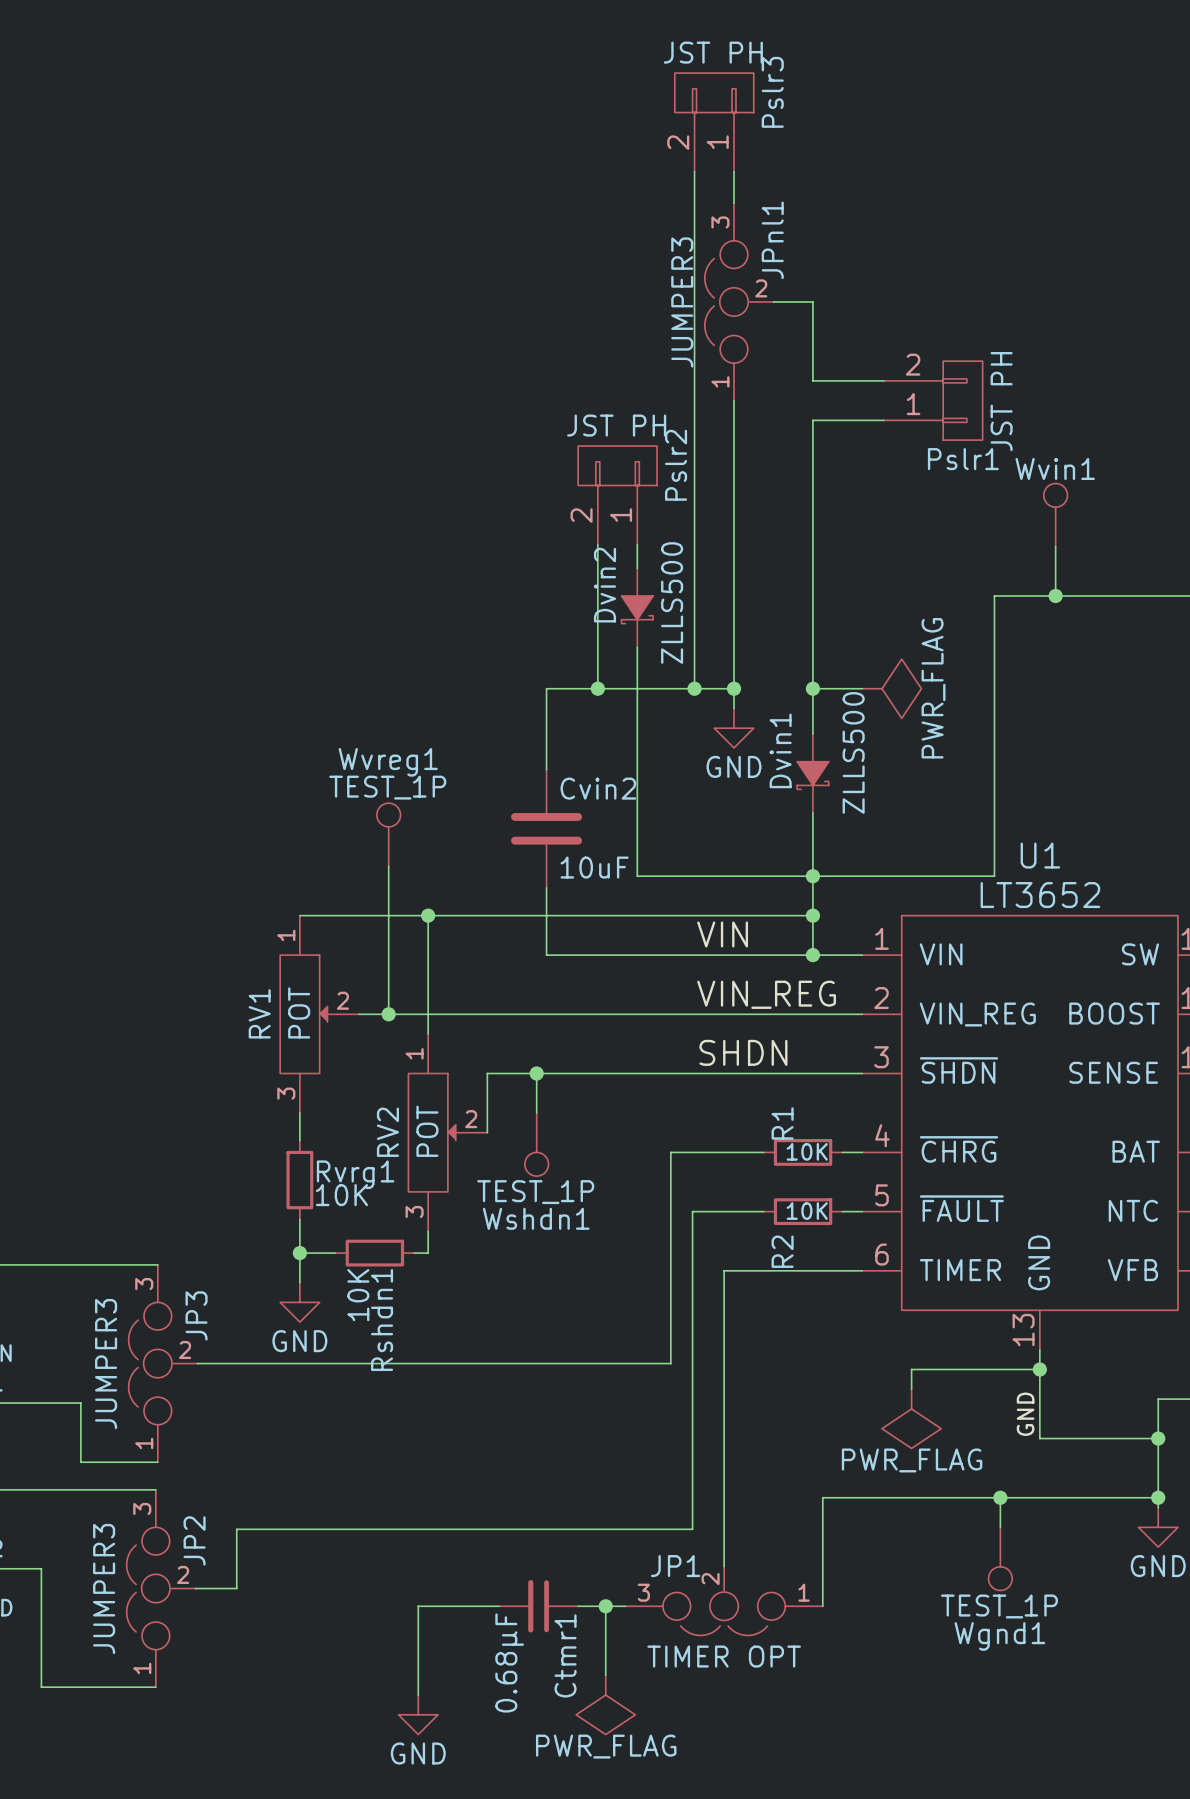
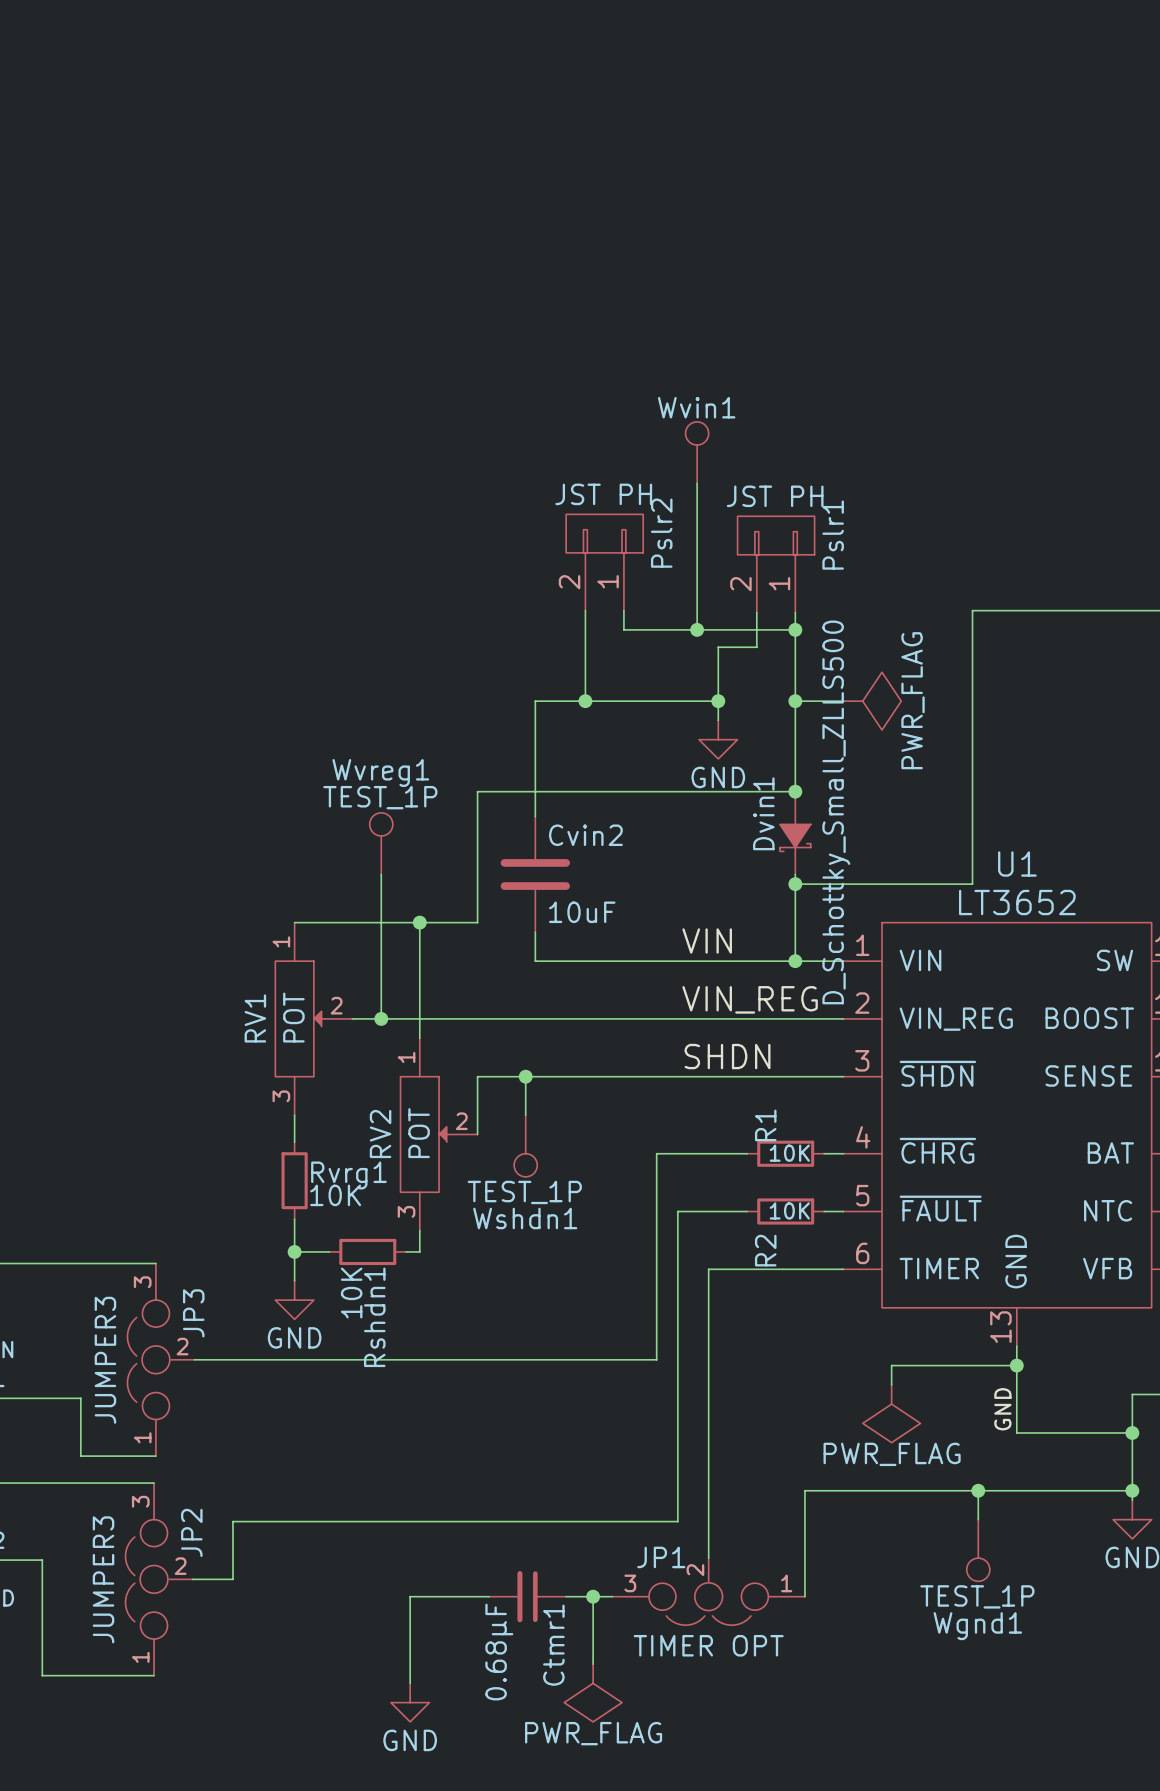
Pslr3: JST PH (714, 122) -> none
wire: (694, 171) (694, 688) -> none
wire: (734, 171) (734, 203) -> none
JPnl1: JUMPER3 (739, 301) -> none
wire: (773, 301) (812, 301) (812, 380) (883, 380) -> none
wire: (734, 400) (734, 633) -> (756, 612) (756, 647) (718, 647)
Pslr1 position: (933, 400) -> (776, 564)
Pslr1 rotation: 0° (962, 400) -> 90° counterclockwise (776, 535)
wire: (883, 420) (812, 420) (812, 597) -> none
wire: none -> (697, 483) (697, 629)
Pslr2 position: (617, 495) -> (604, 562)
Wvin1 position: (1055, 515) -> (697, 452)
wire: (1055, 546) (1055, 595) -> none
wire: none -> (623, 610) (623, 629) (795, 629)
junction: (1055, 595) -> none
Dvin2: ZLLS500 (637, 607) -> none
junction: none -> (697, 629)
junction: none -> (795, 629)
wire: (637, 647) (637, 876) (812, 876) -> none
junction: (694, 688) -> none
Dvin1 value: ZLLS500 (853, 752) -> D_Schottky_Small_ZLLS500 (836, 812)
Dvin1 position: (812, 773) -> (795, 835)
junction: none -> (795, 791)
Cvin2 position: (546, 828) -> (535, 874)
wire: (487, 915) (812, 915) -> (477, 922) (477, 791) (795, 791)
junction: (812, 915) -> none

